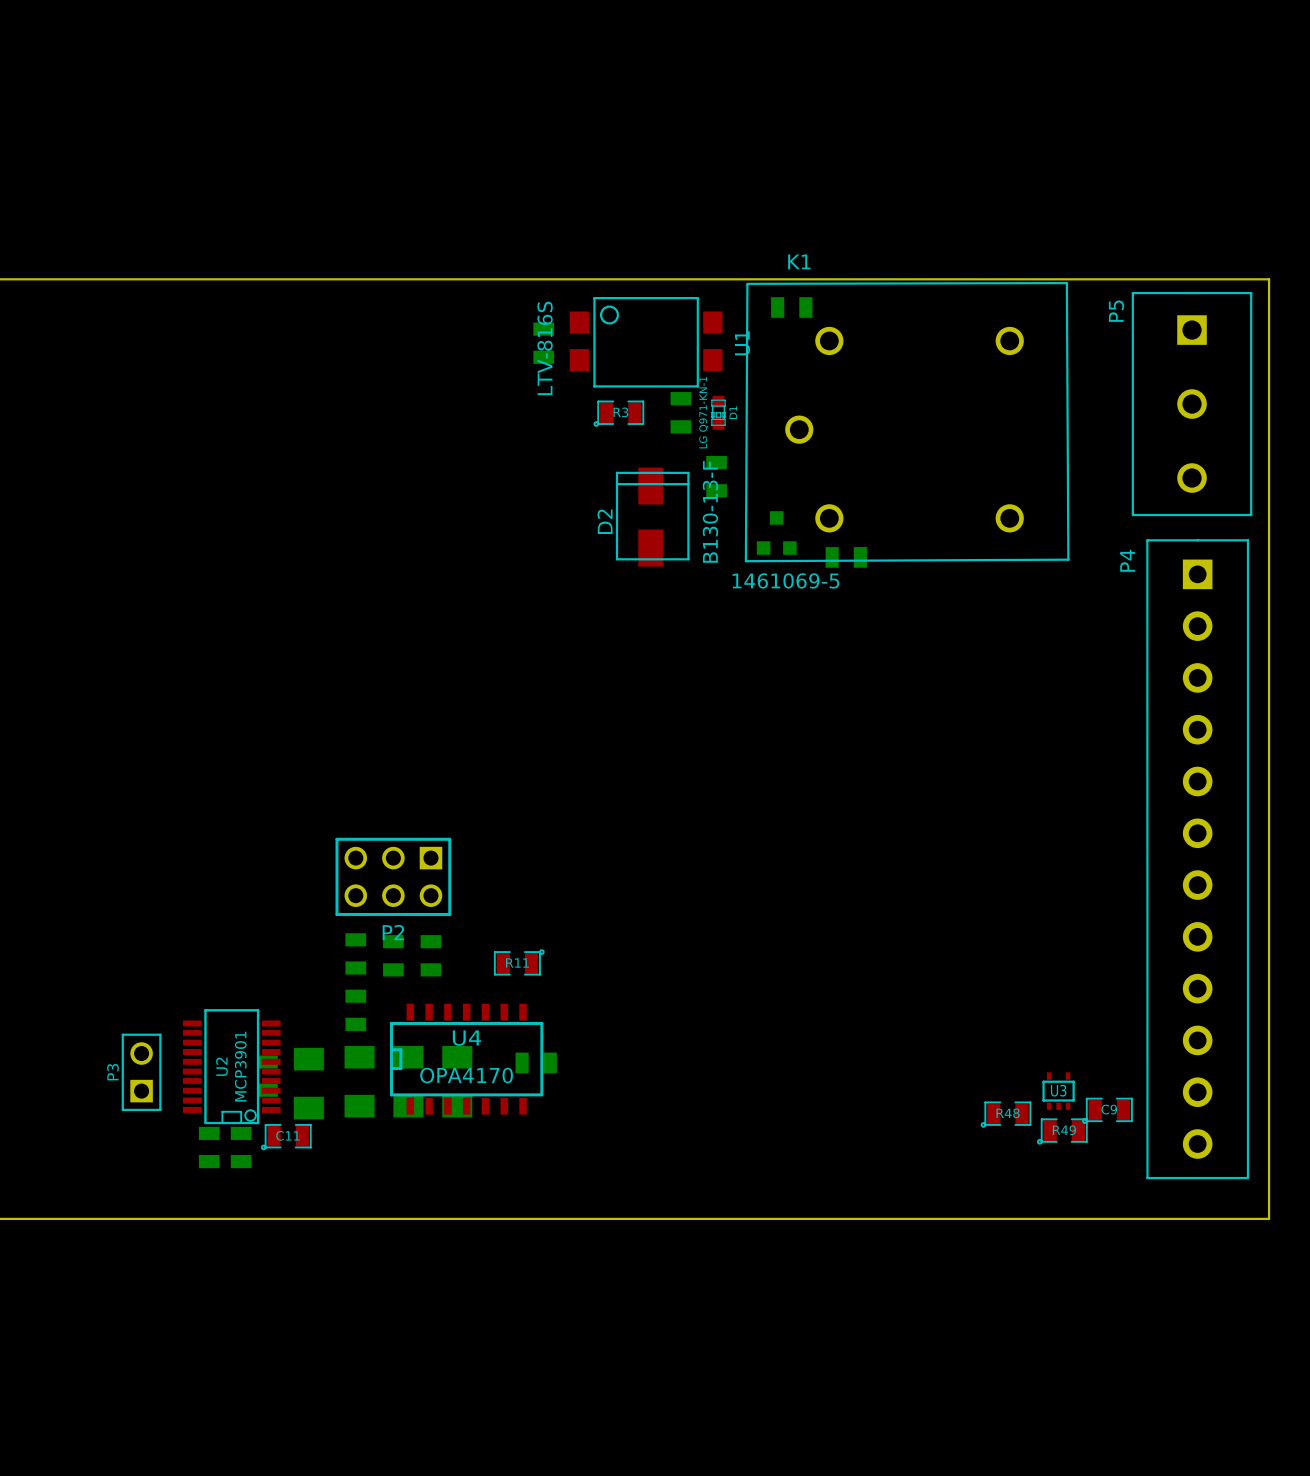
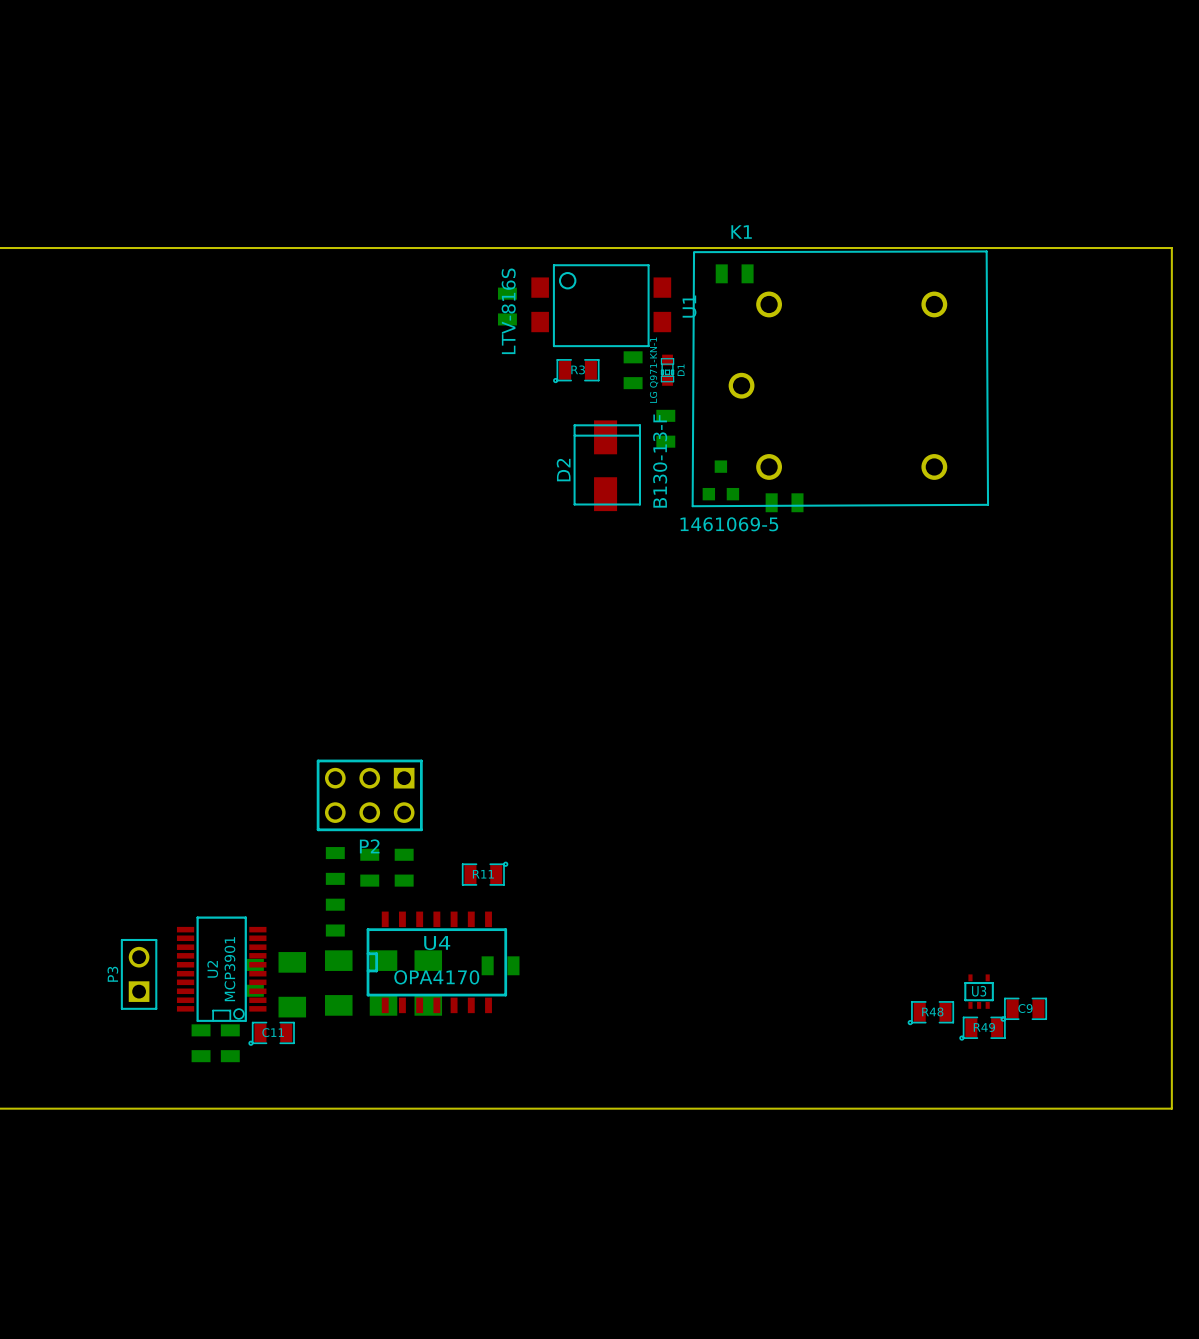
P5: (1192, 404) -> none
P4: (1197, 859) -> none

